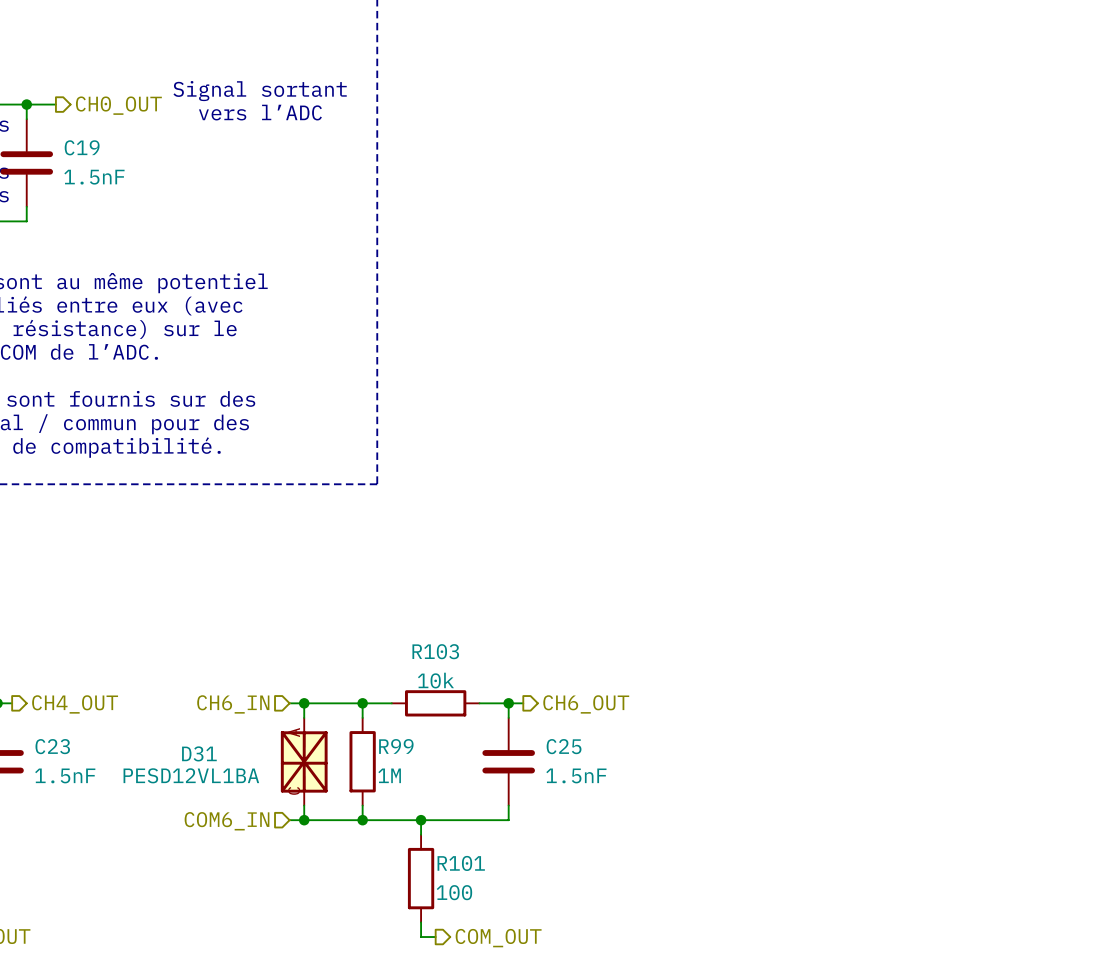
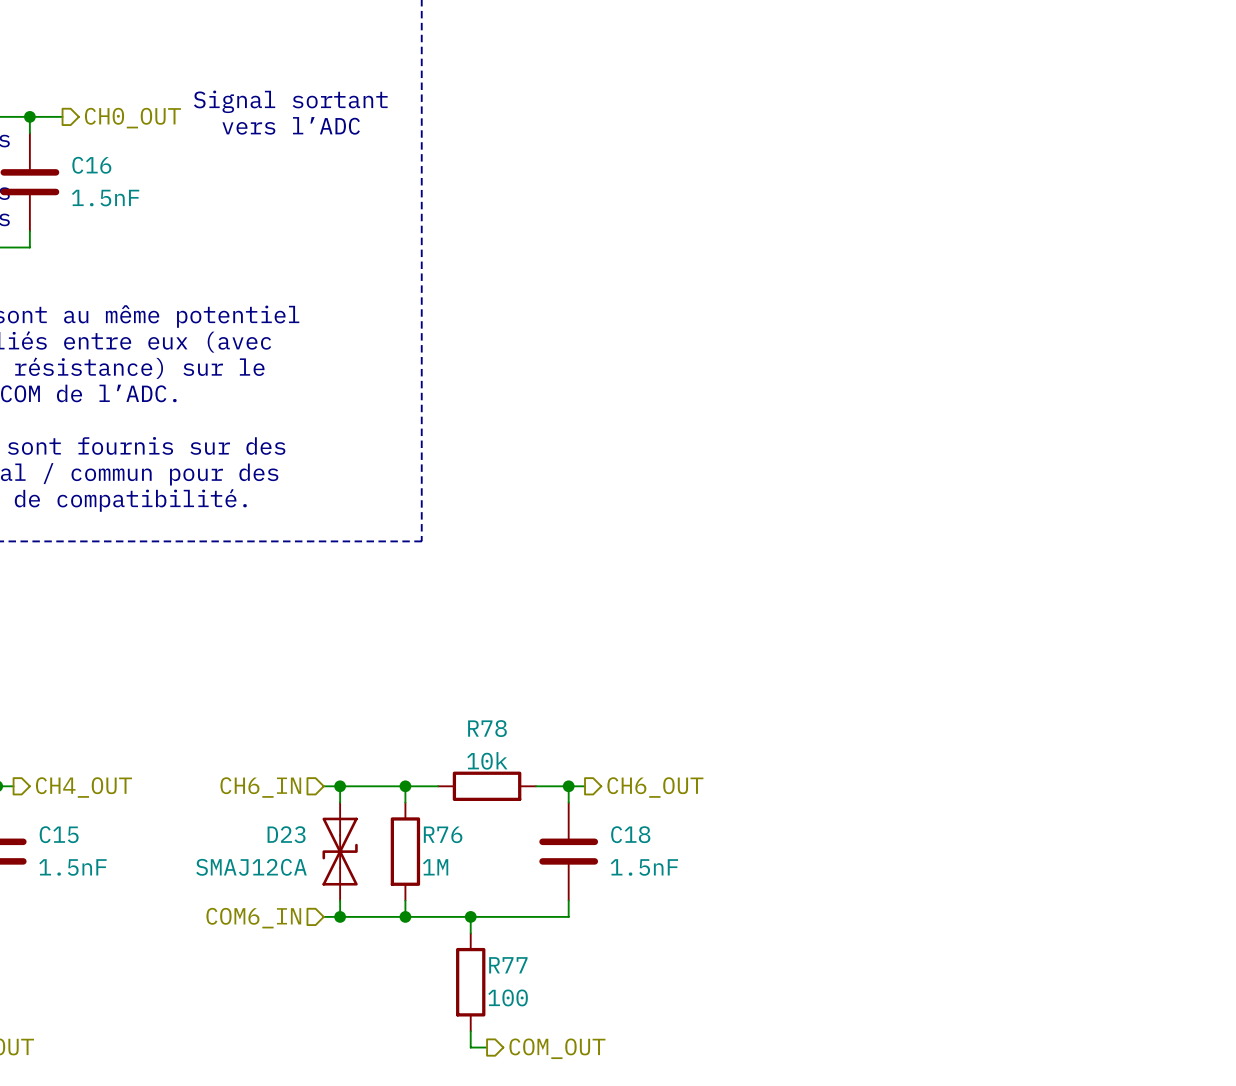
C19 name: C19 (82, 147) -> C16 (91, 165)
R103 name: R103 (435, 651) -> R78 (487, 728)
C23 name: C23 (52, 746) -> C15 (59, 834)
R99 name: R99 (396, 746) -> R76 (443, 834)
C25 name: C25 (564, 746) -> C18 (630, 834)
D31: PESD12VL1BA (304, 761) -> none
D23: none -> SMAJ12CA (340, 851)
R101 name: R101 (461, 863) -> R77 (508, 965)

